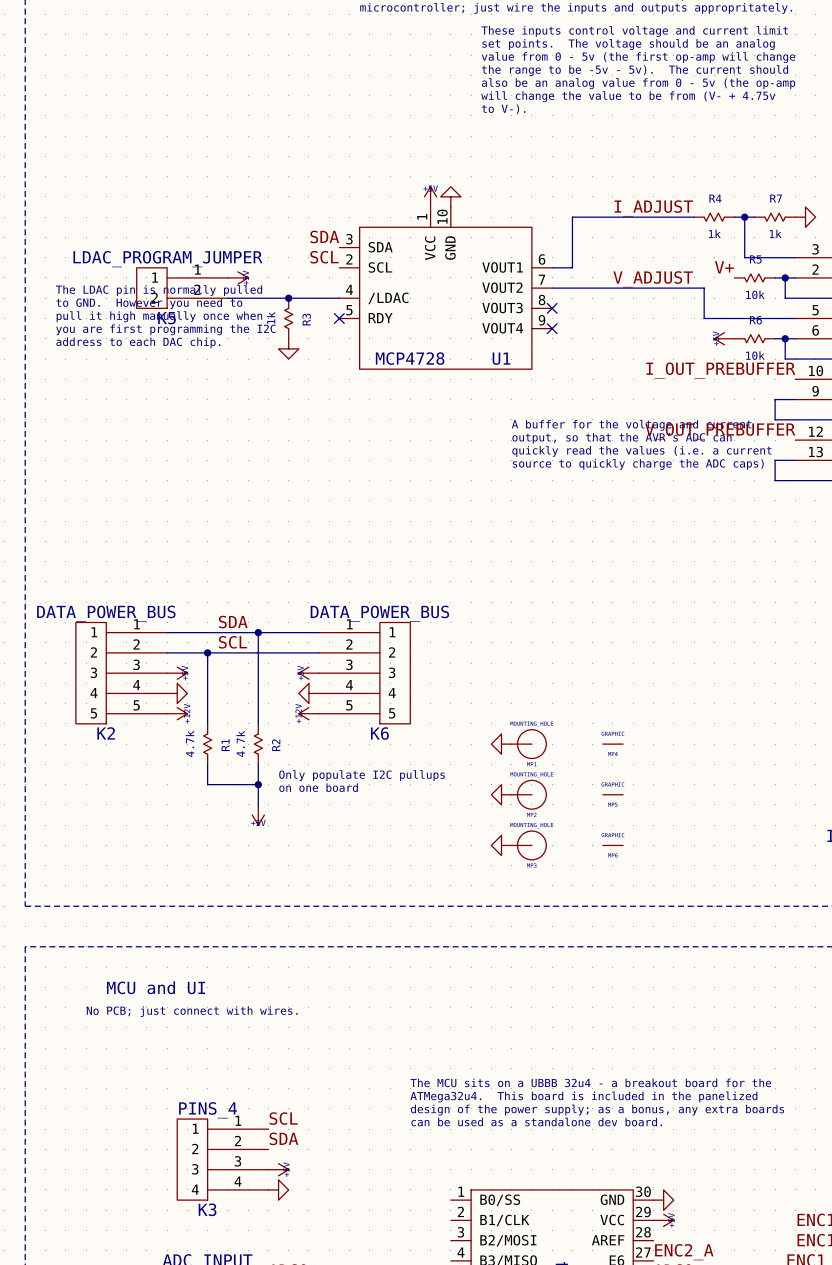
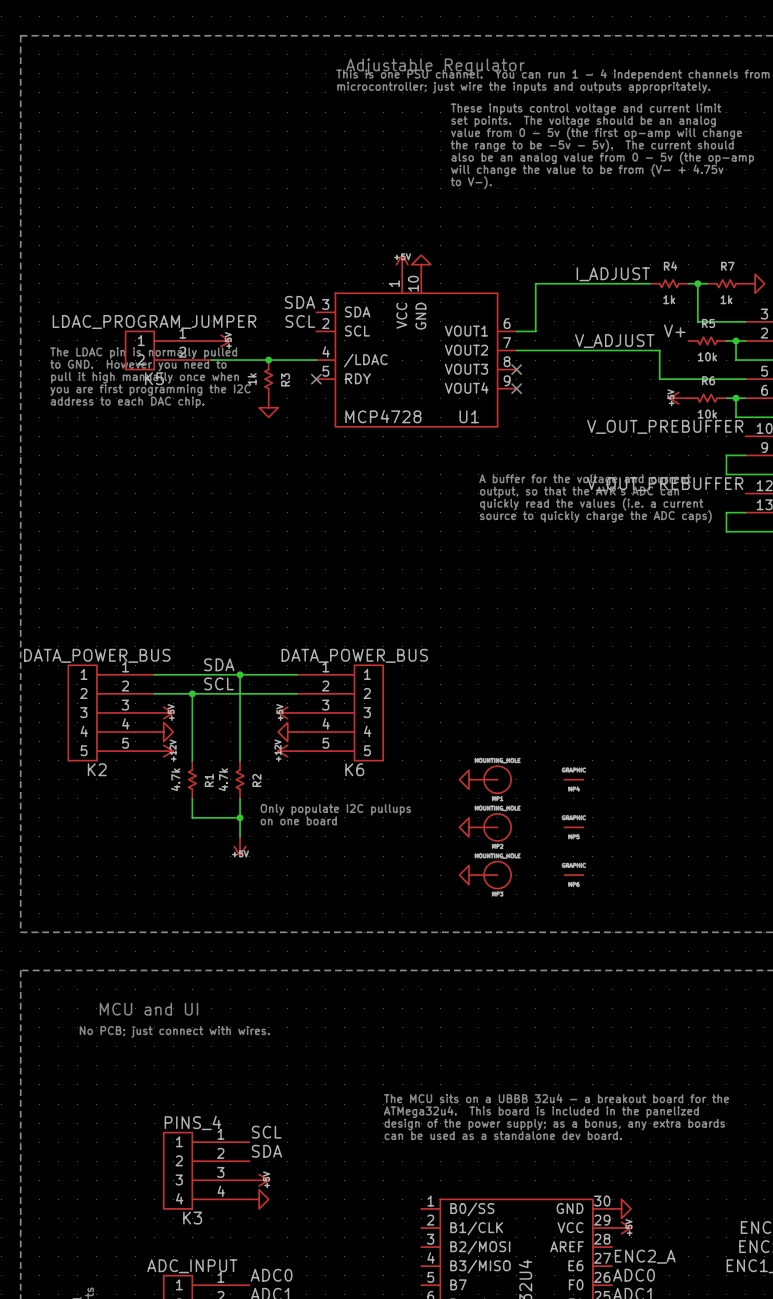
label: I_OUT_PREBUFFER (720, 370) -> V_OUT_PREBUFFER (665, 426)

